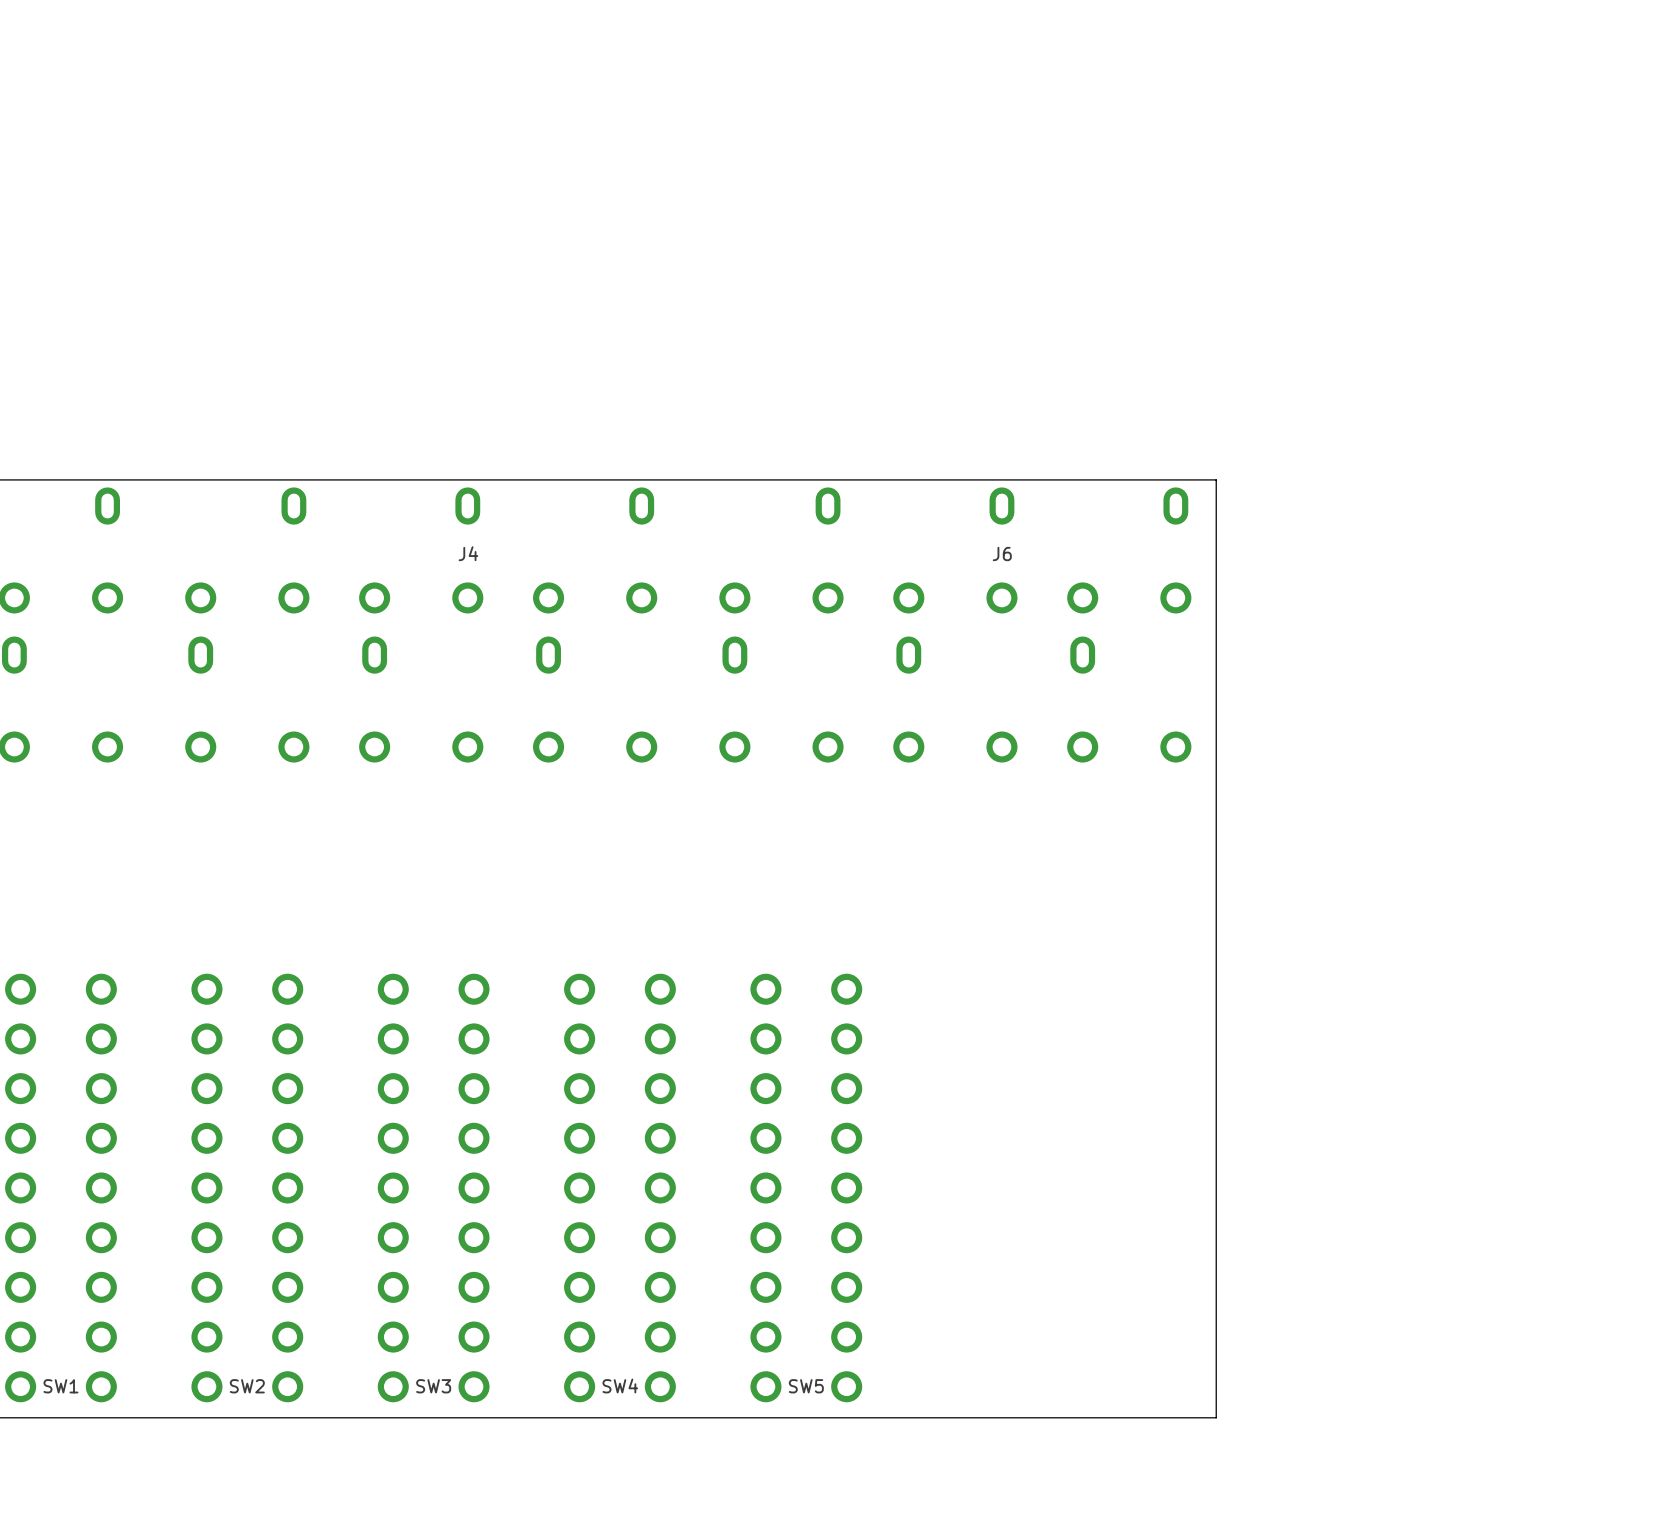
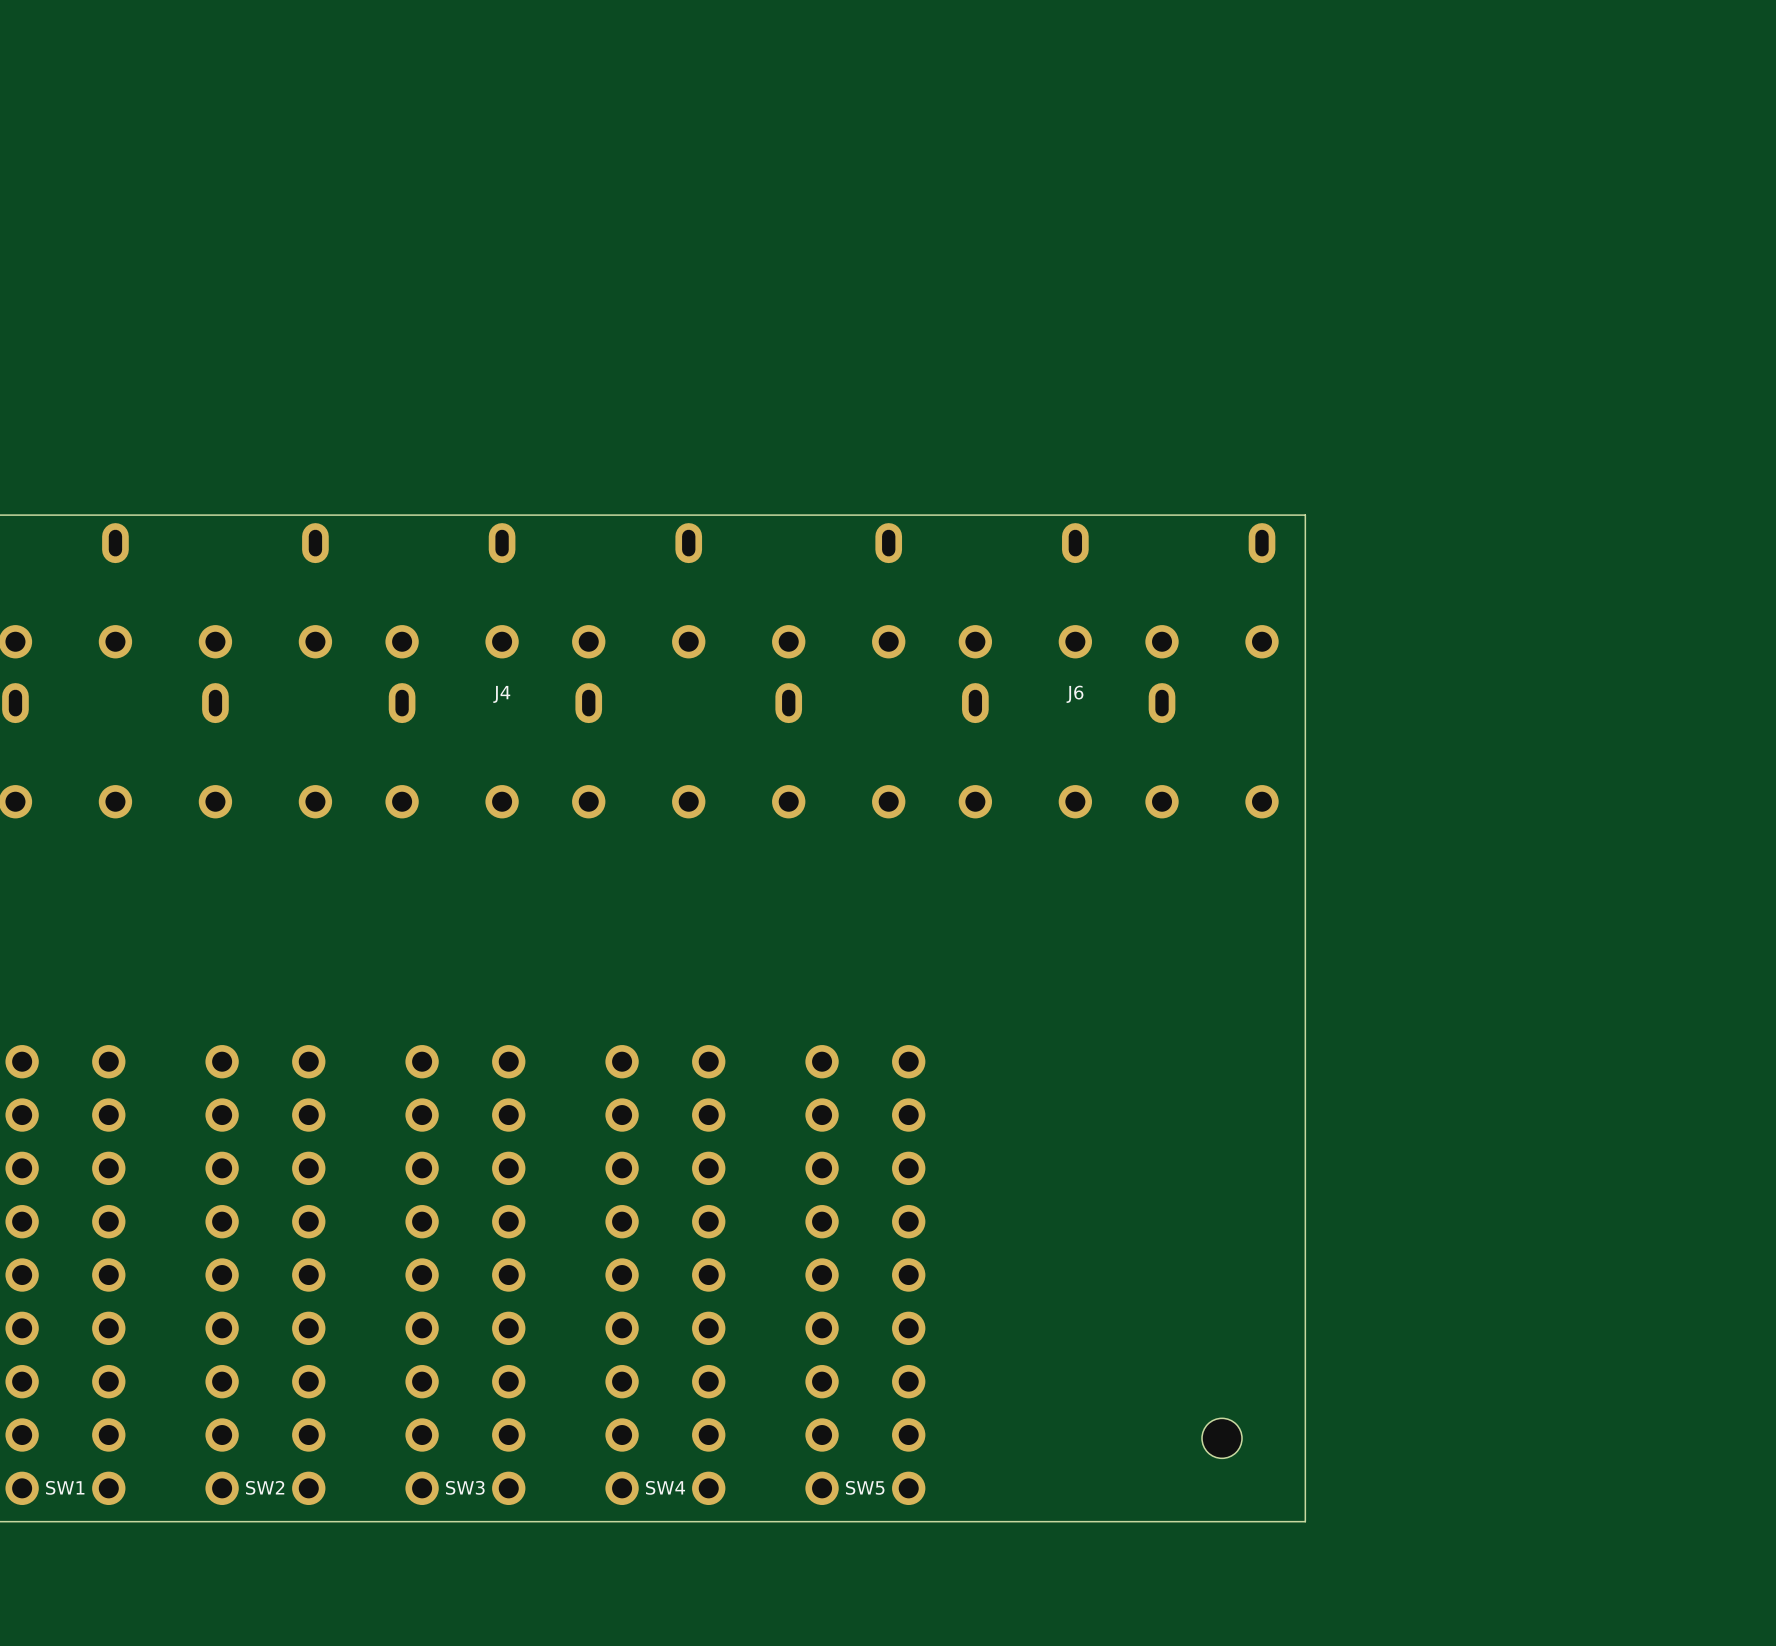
J4 name position: J4 (468, 553) -> J4 (501, 694)
J6 name position: J6 (1002, 554) -> J6 (1074, 694)
part: none -> (1222, 1438)

